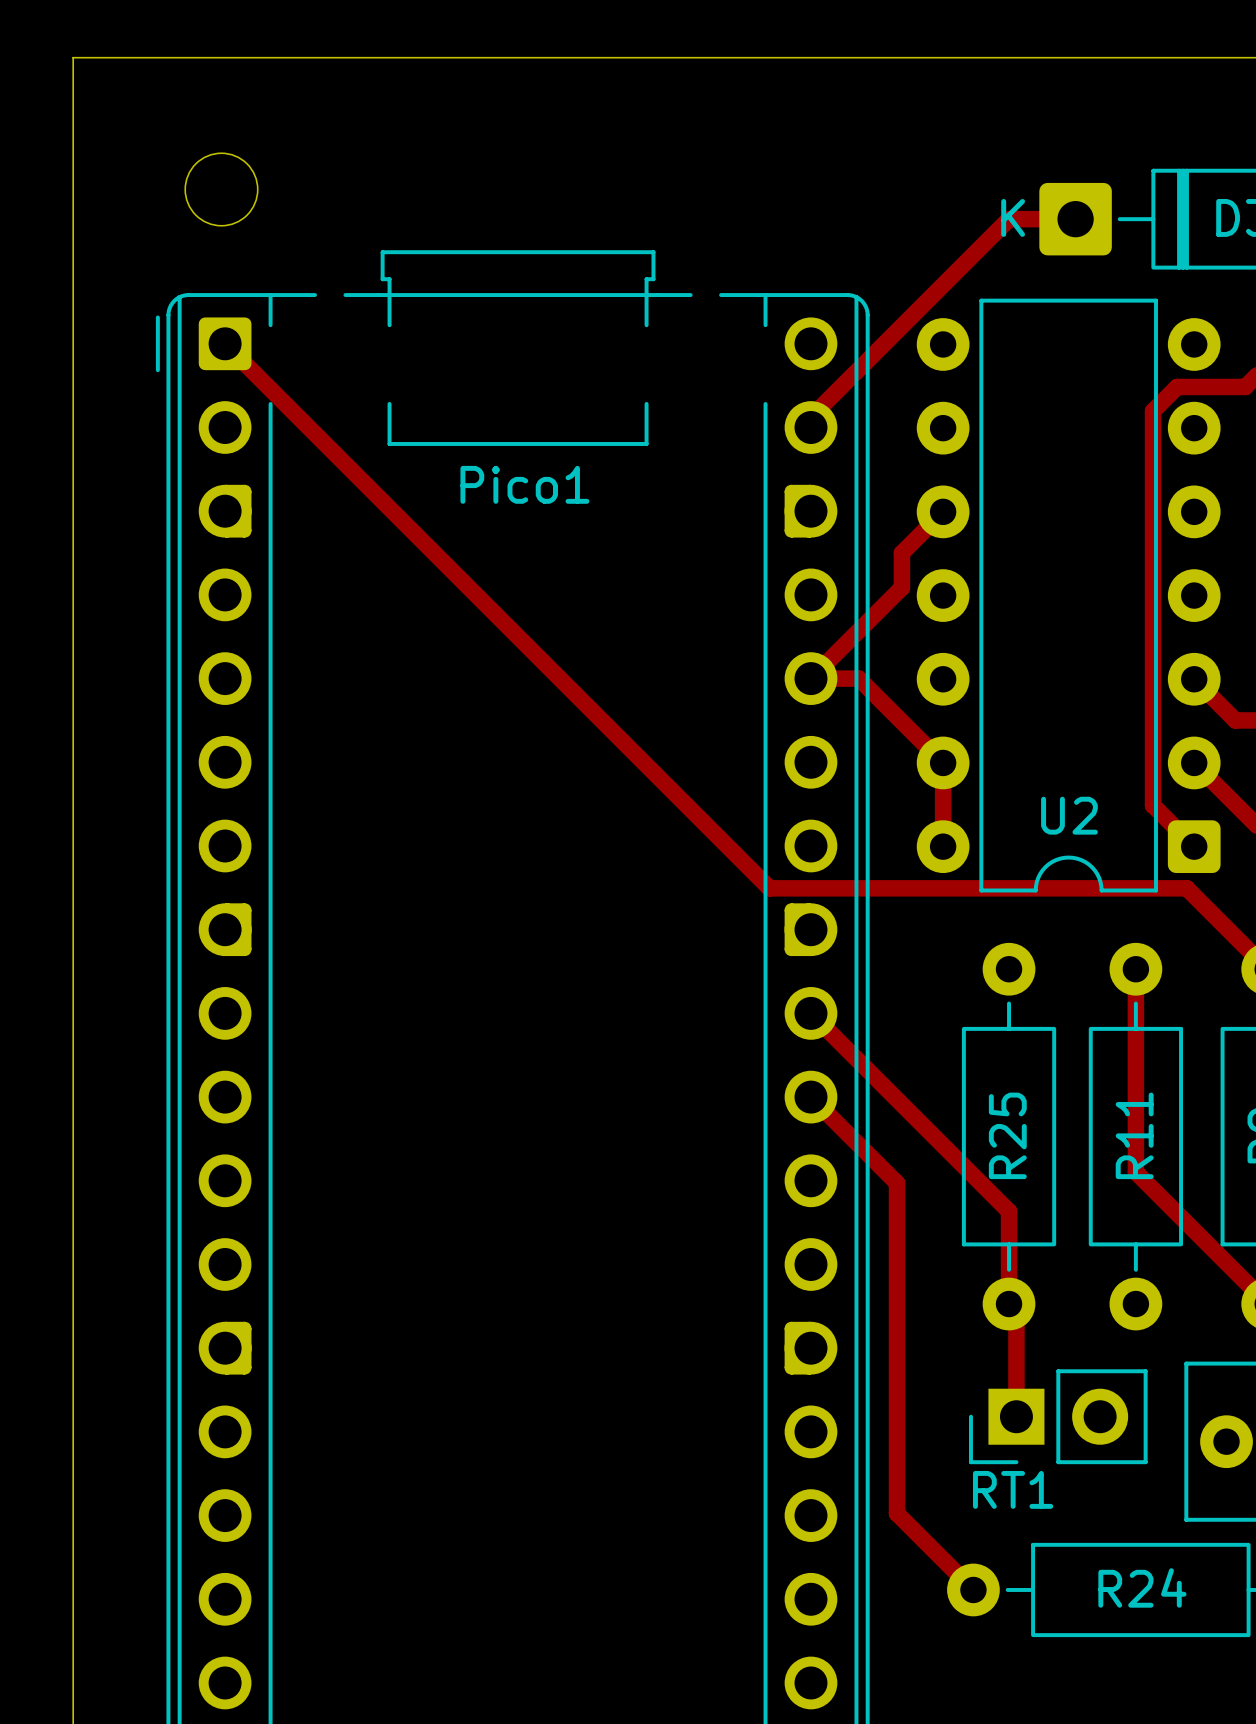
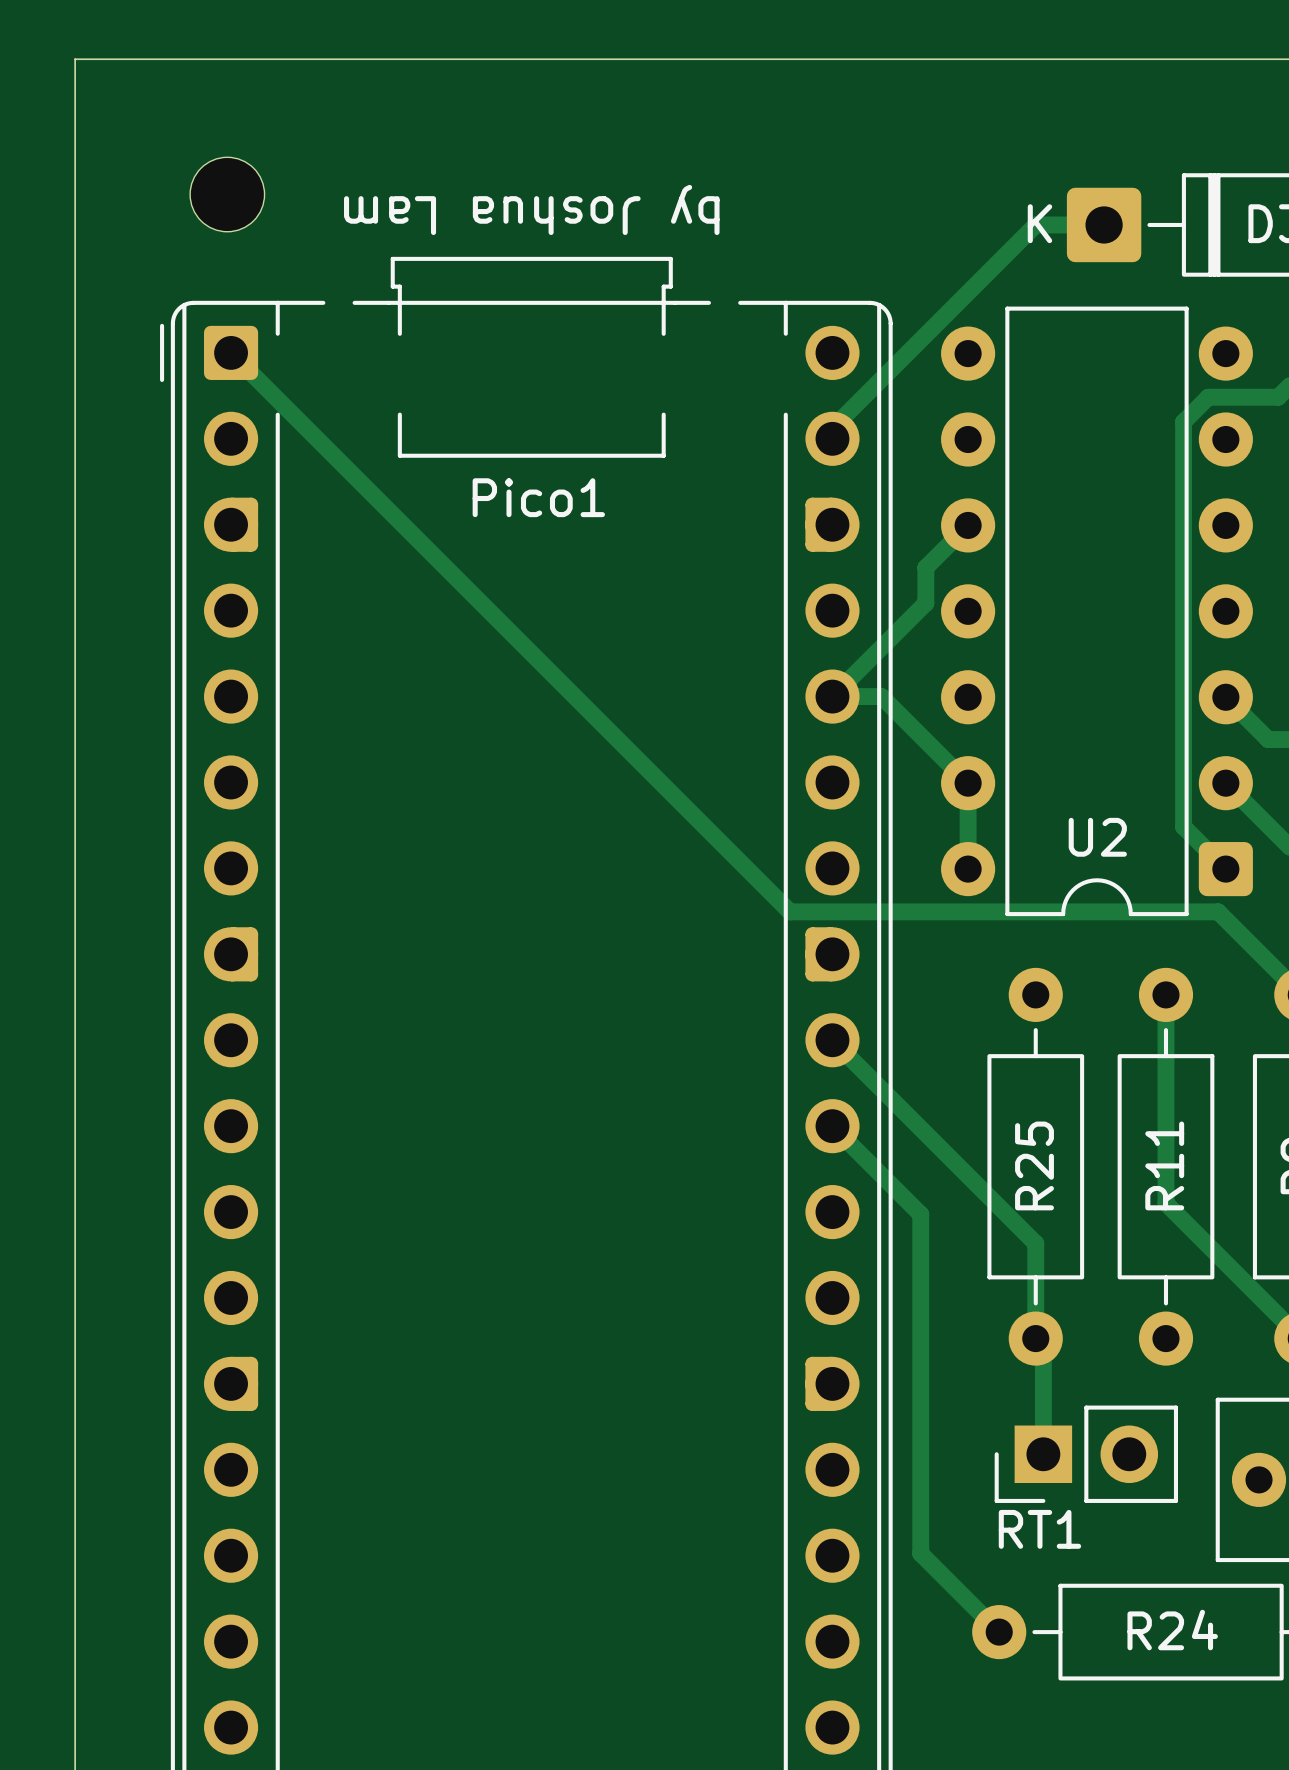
text: none -> by Joshua Lam (531, 209)

